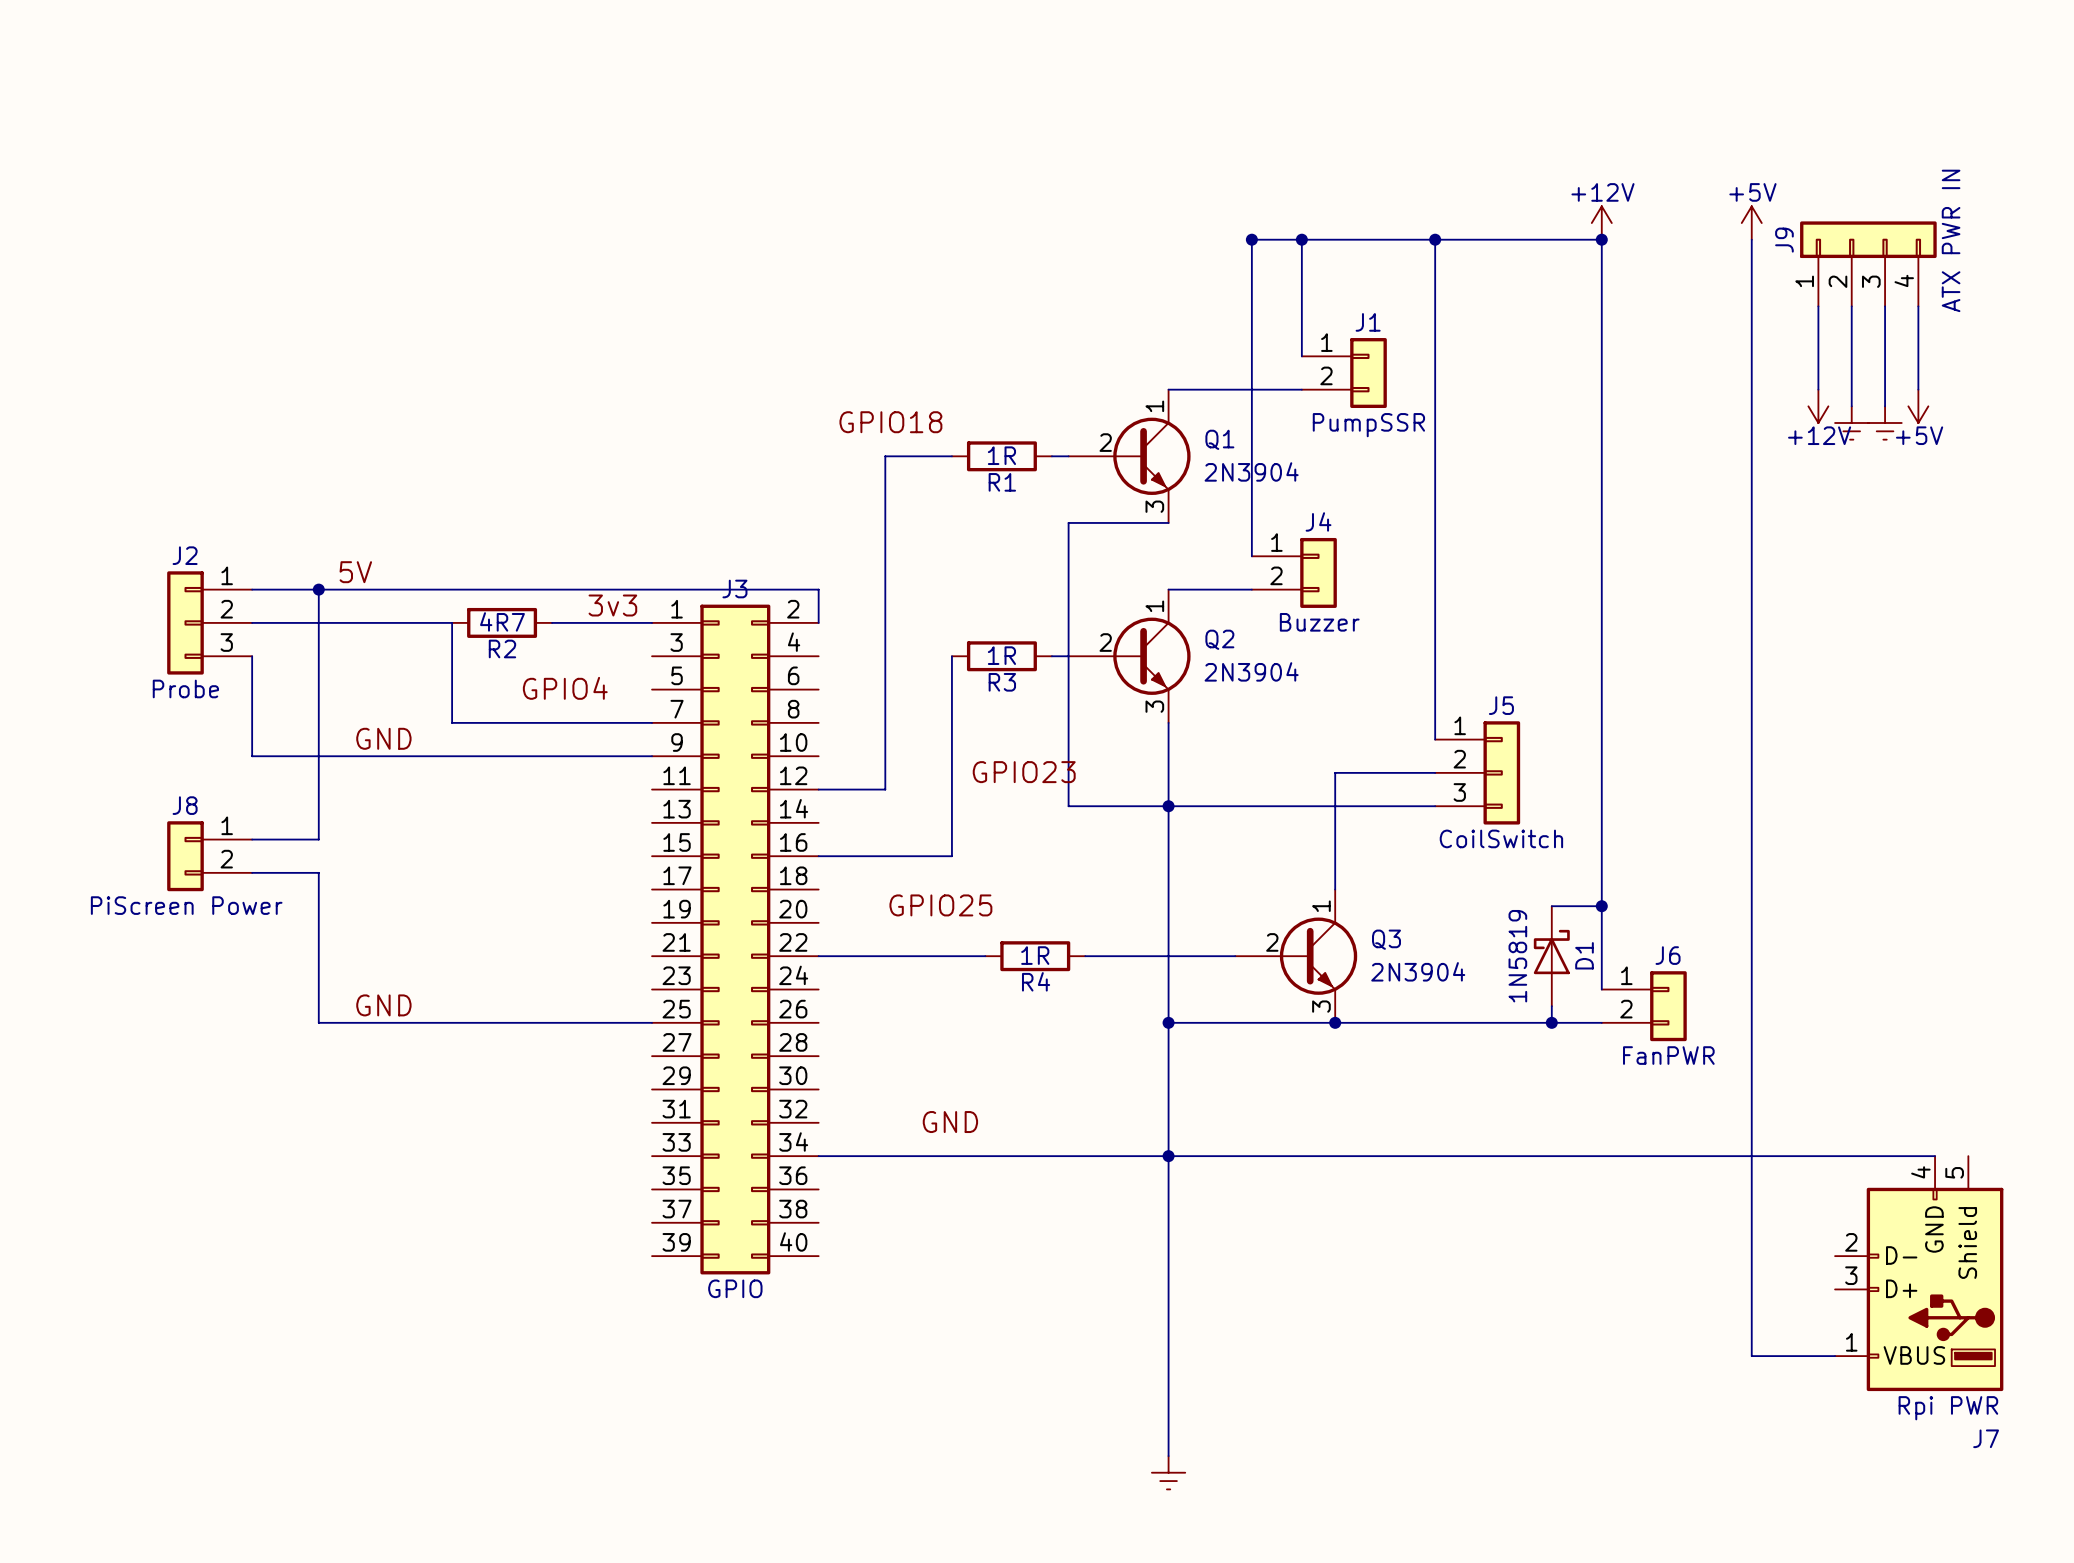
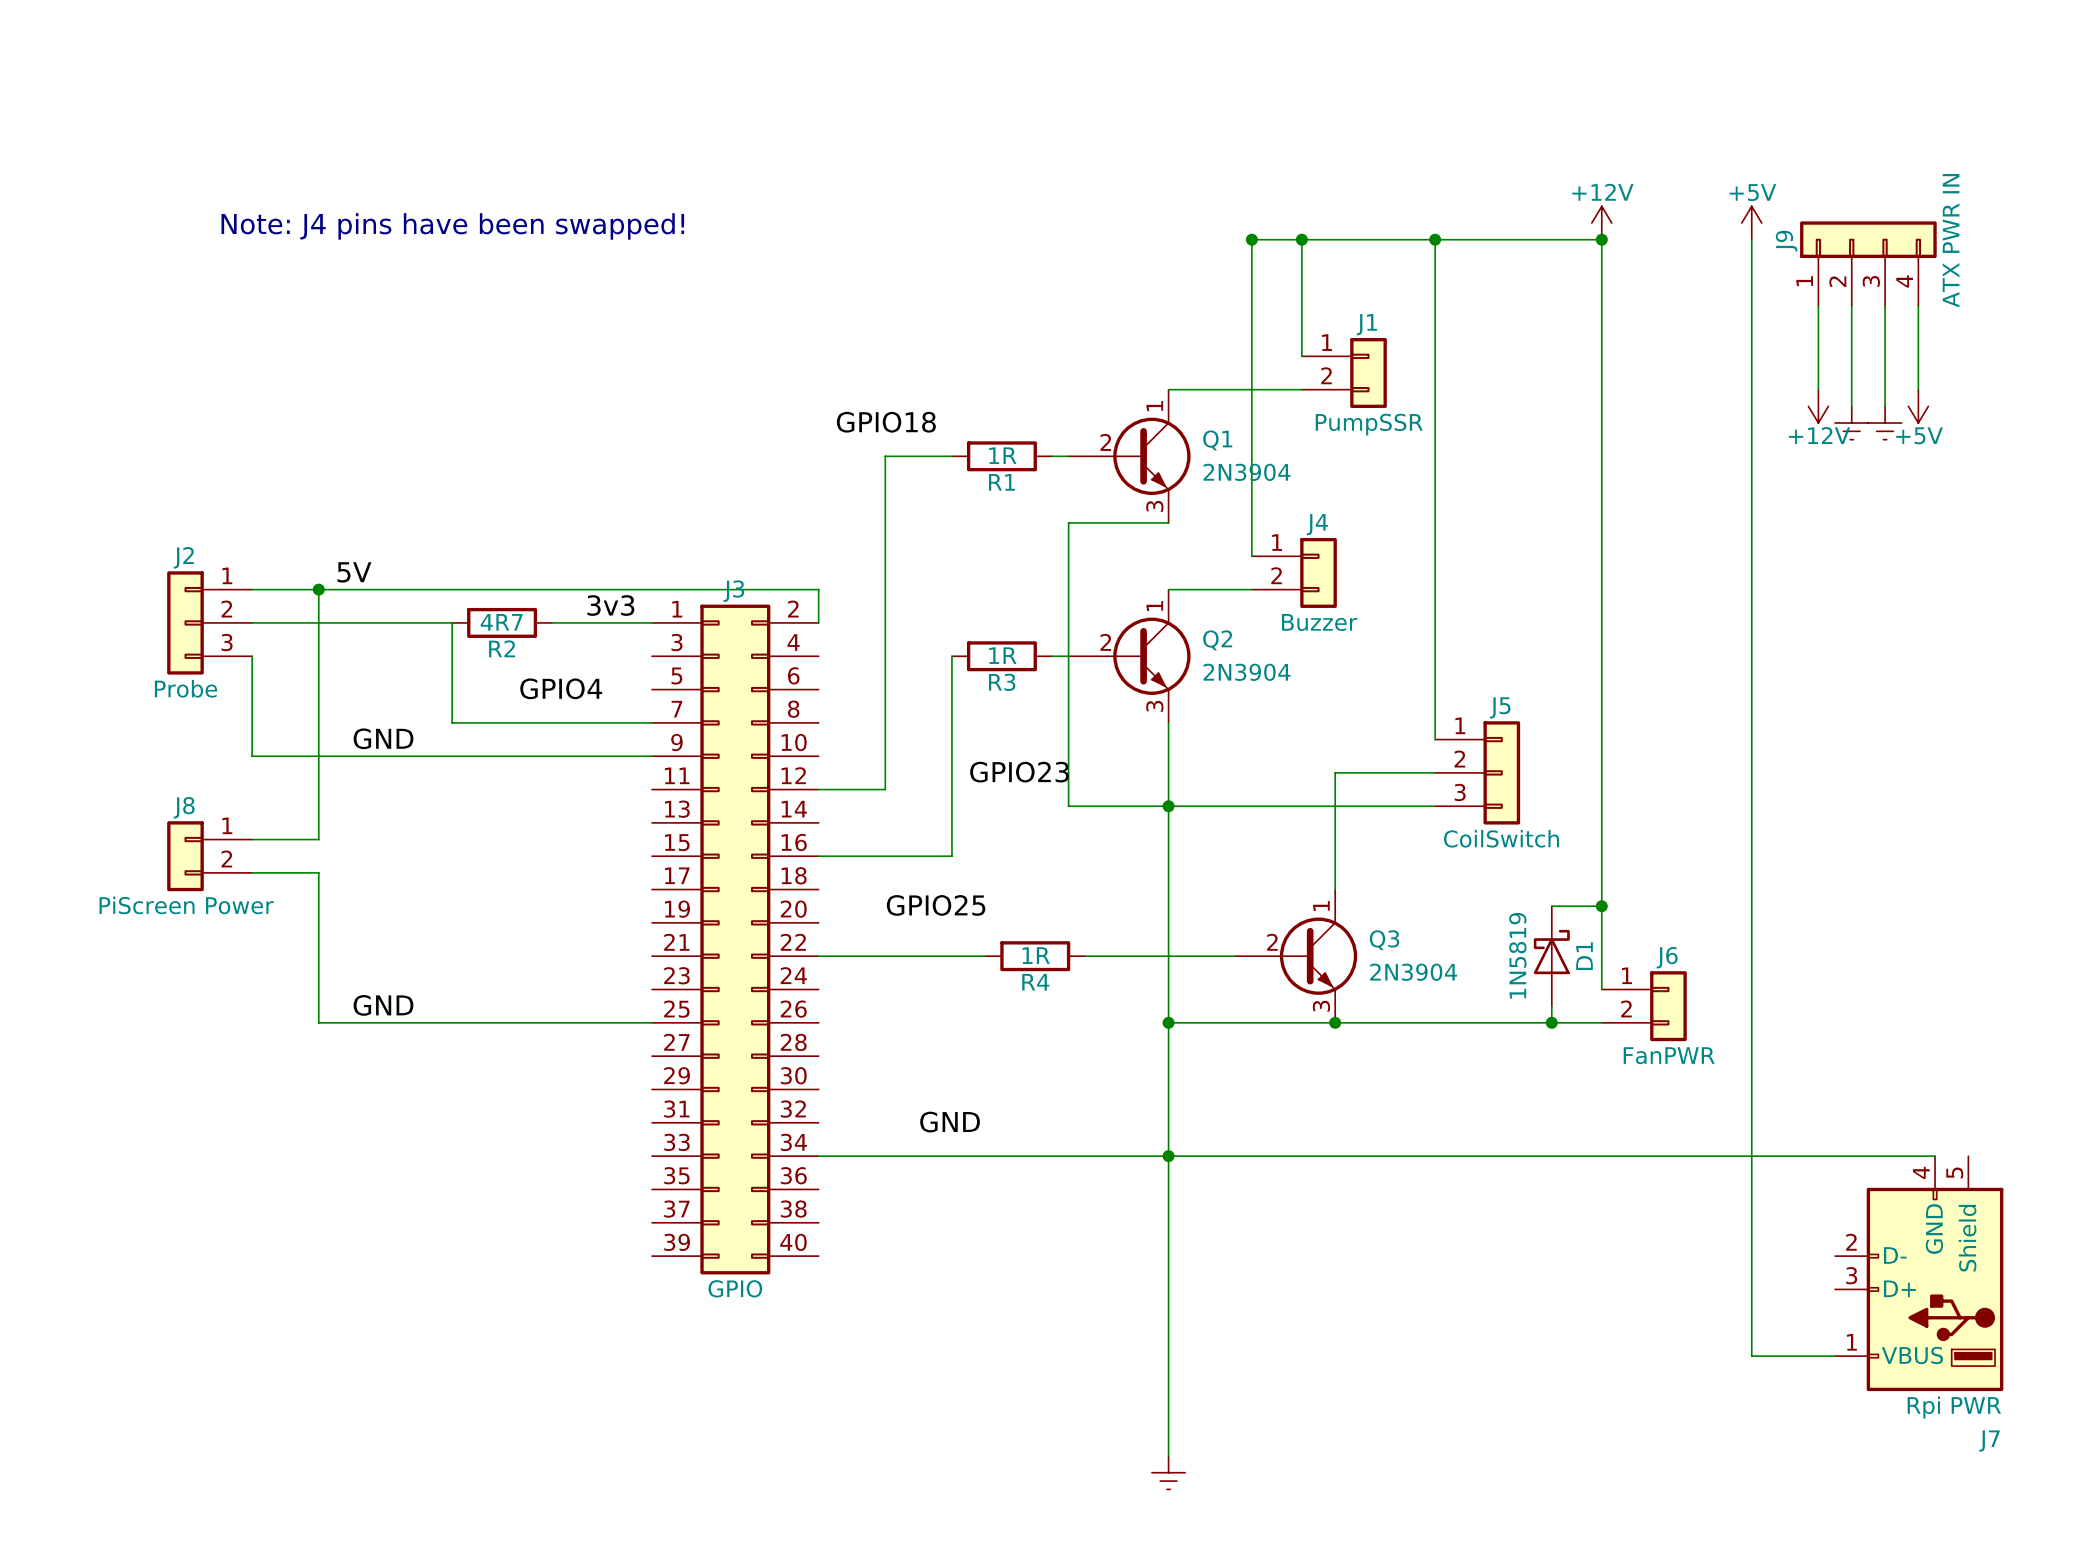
text: none -> Note: J4 pins have been swapped! (452, 226)

